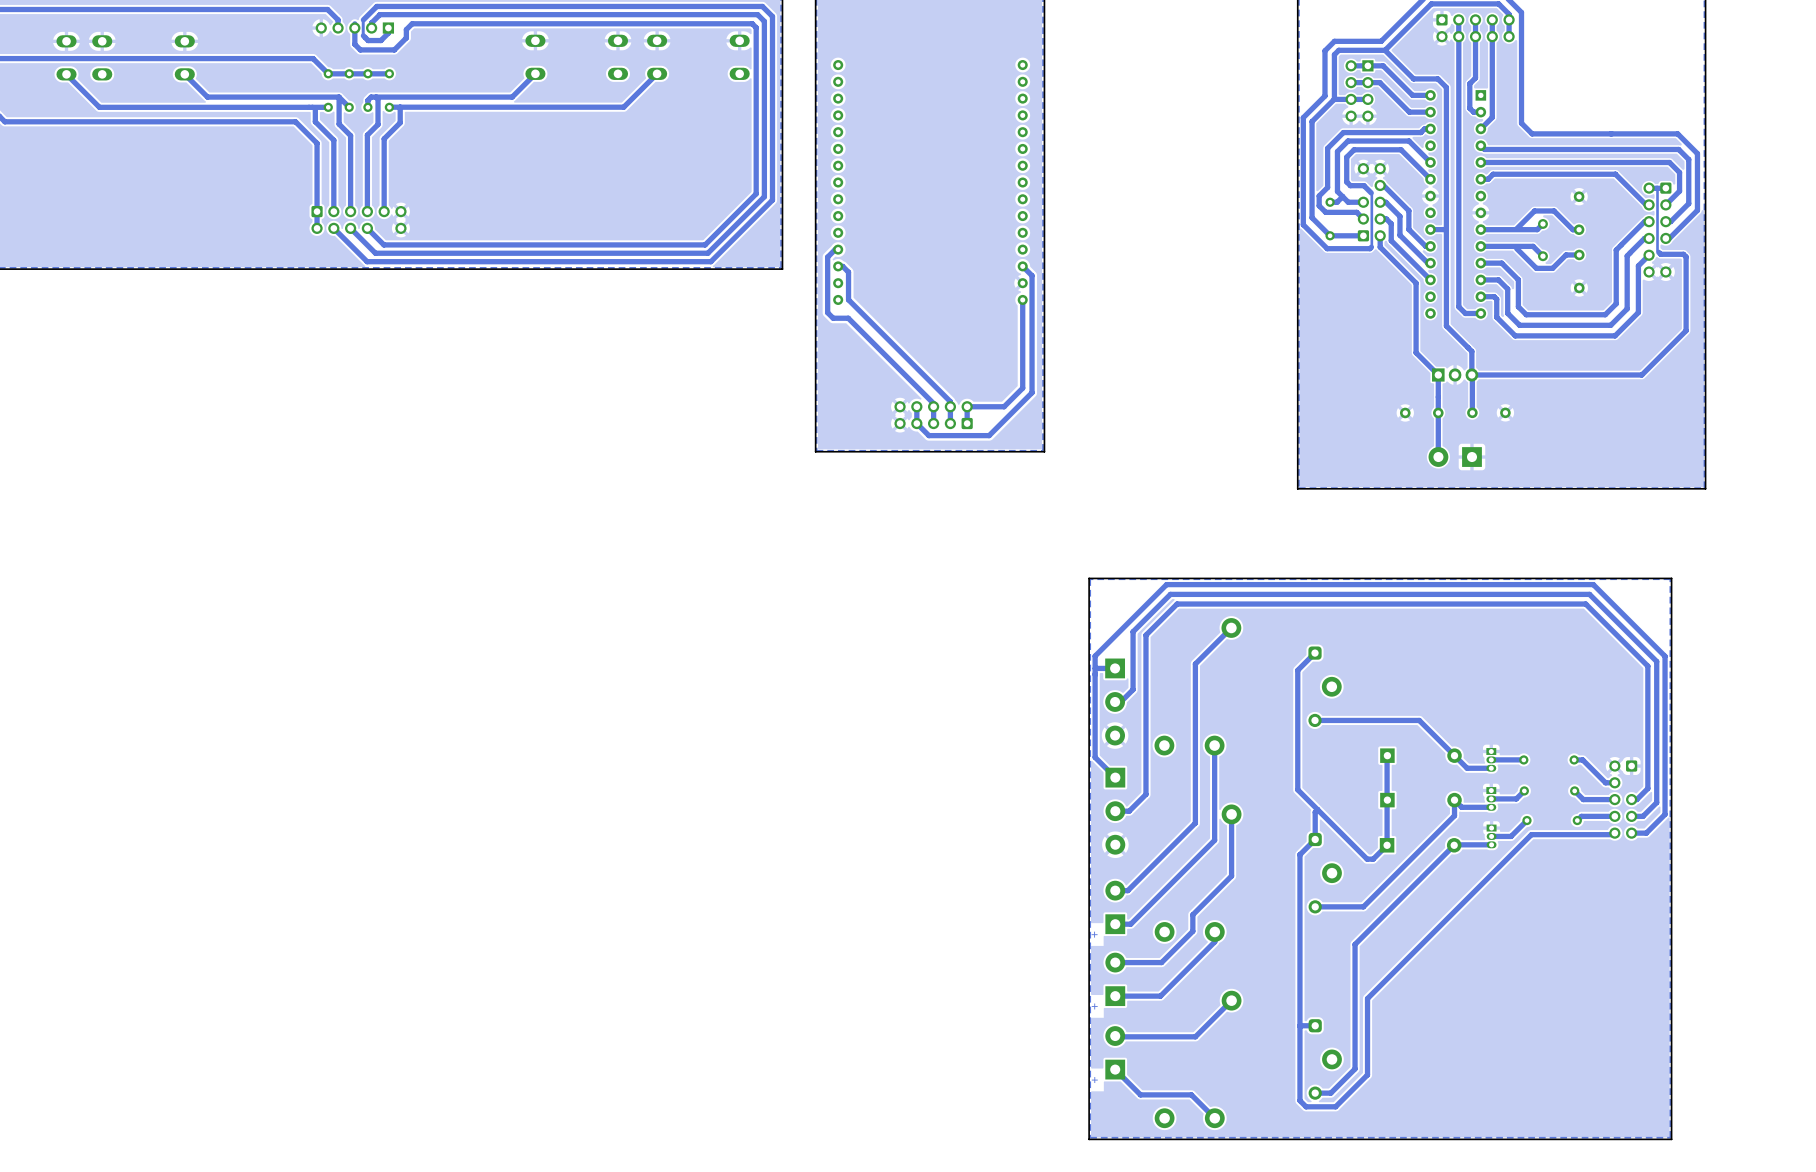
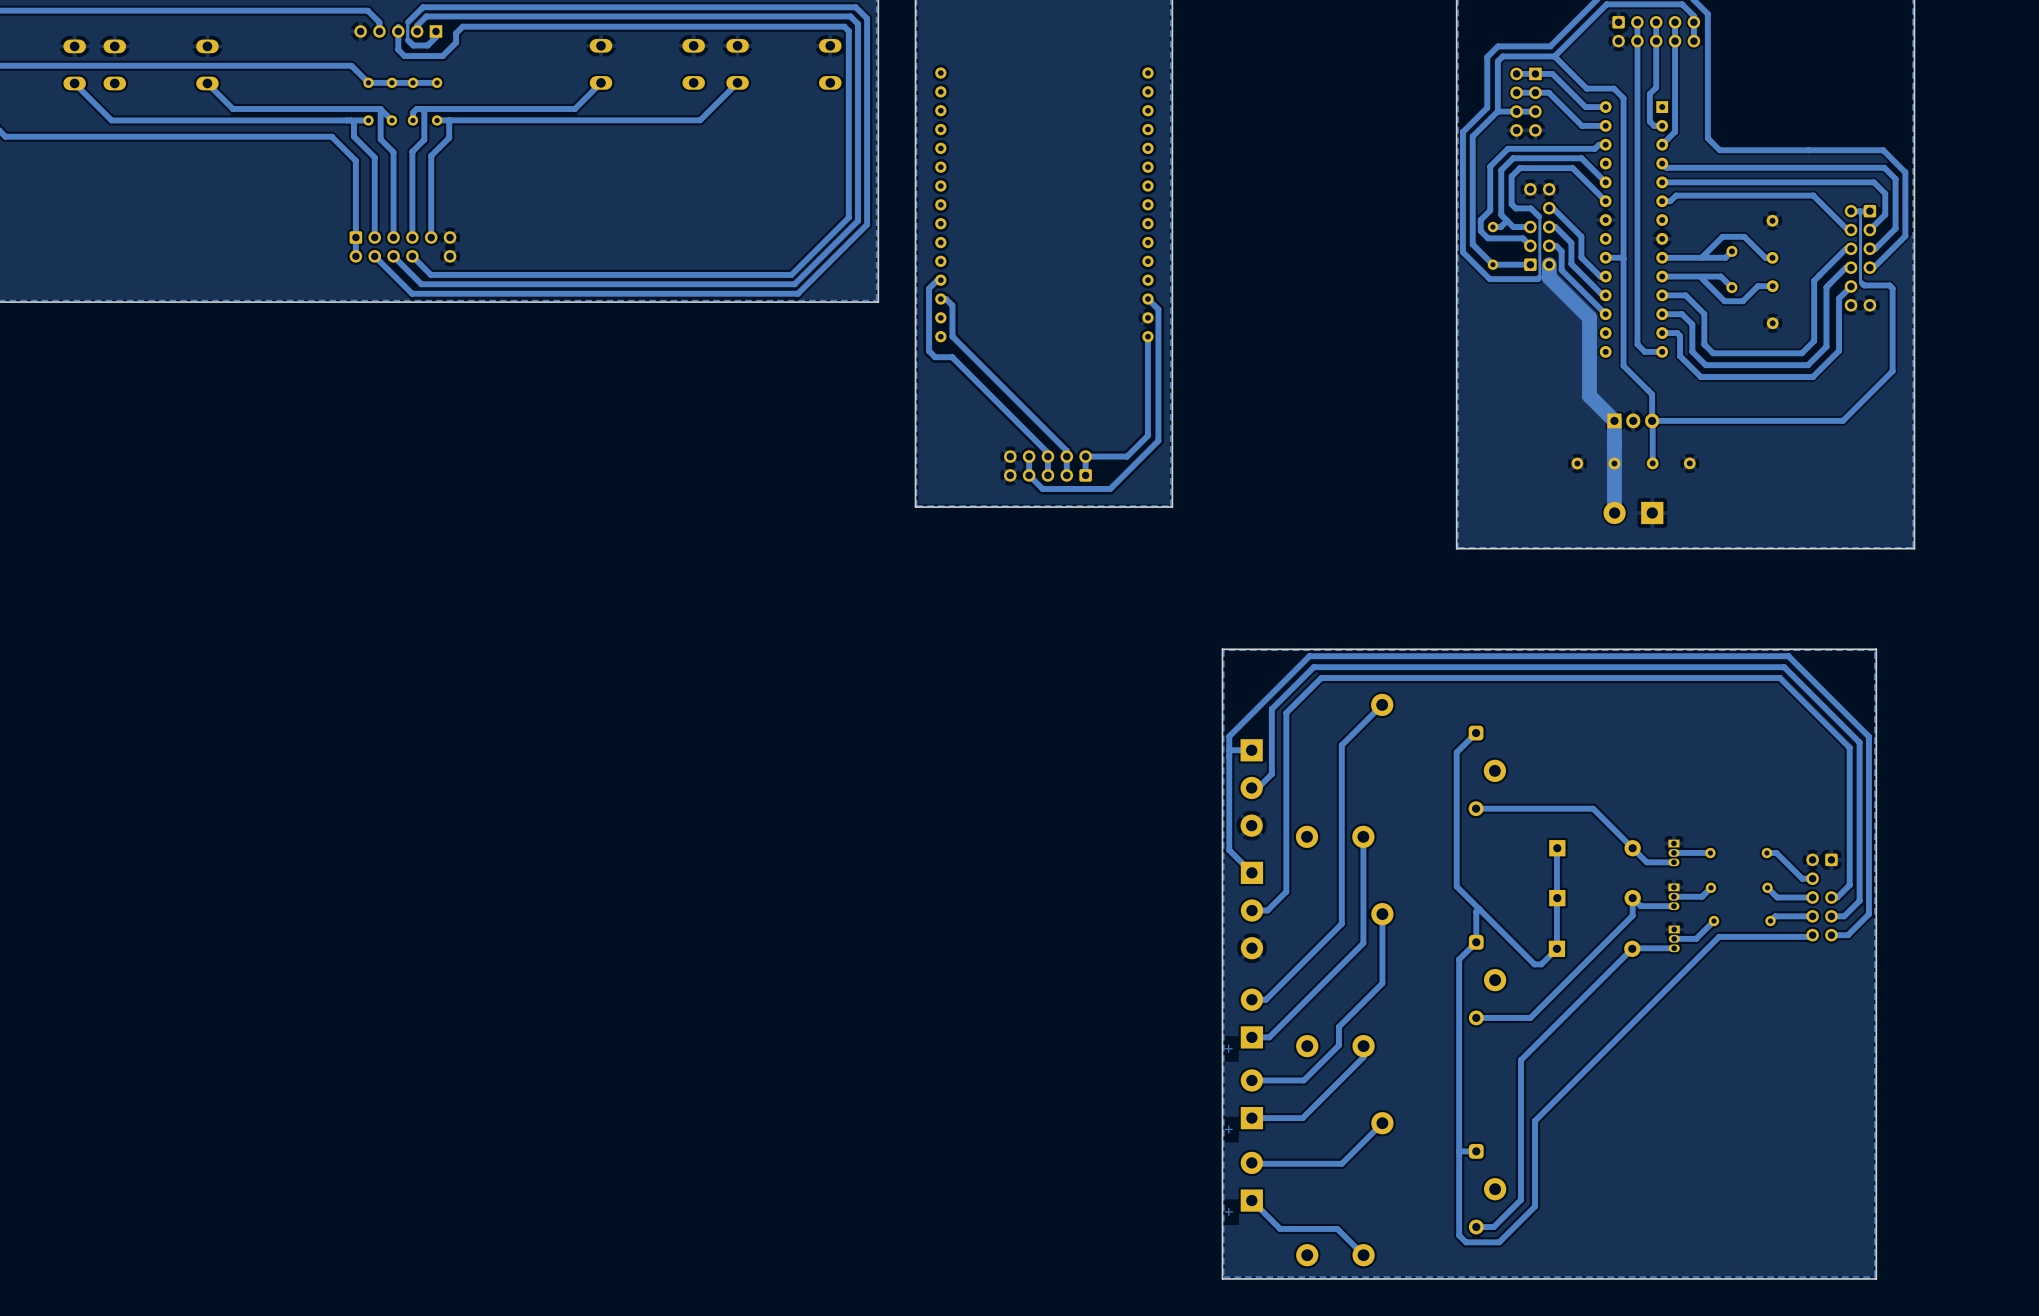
bottom track width: thin (1380, 235) (1380, 247) (1416, 283) (1416, 352) (1438, 374) (1438, 456) -> thick (1549, 264) (1549, 277) (1589, 317) (1589, 395) (1614, 420) (1614, 512)

